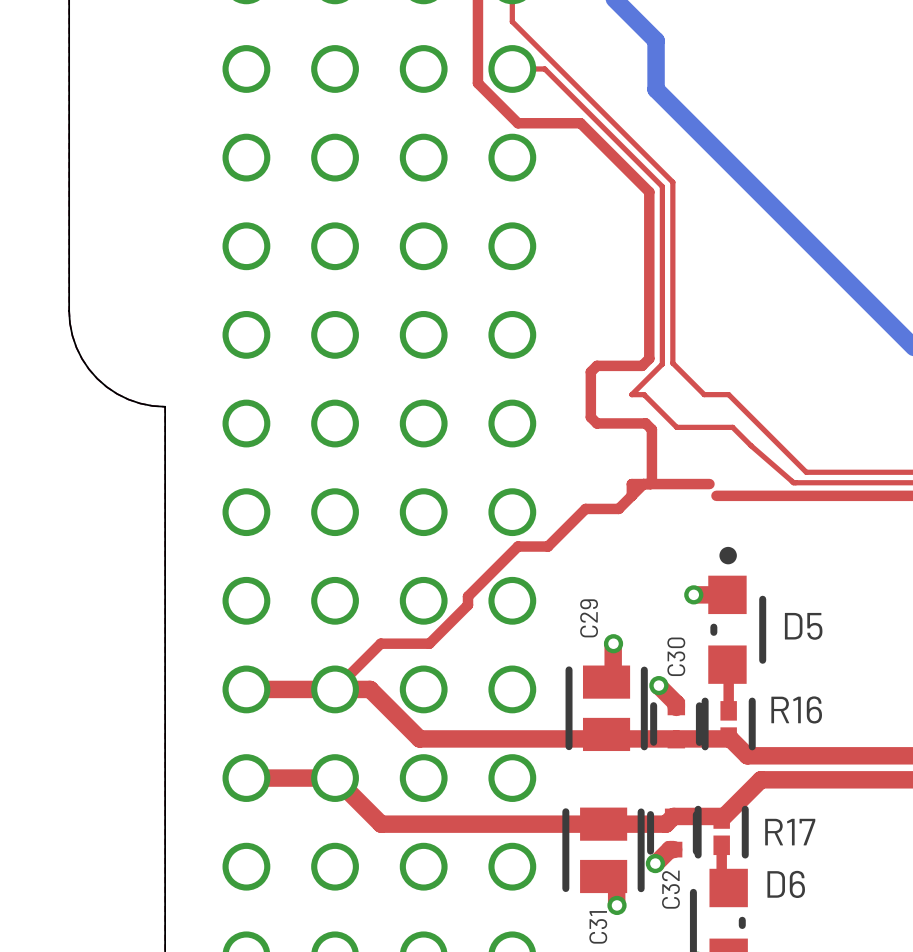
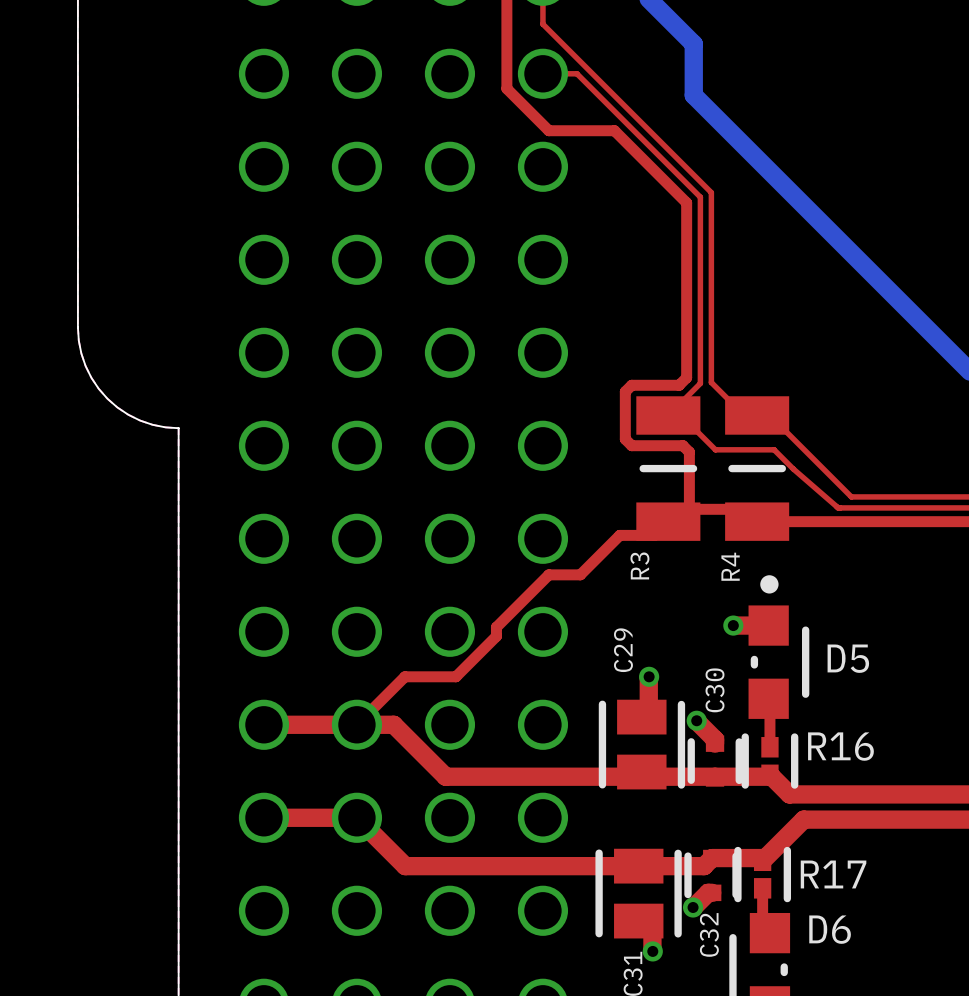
R3: none -> (668, 468)
R4: none -> (757, 468)

